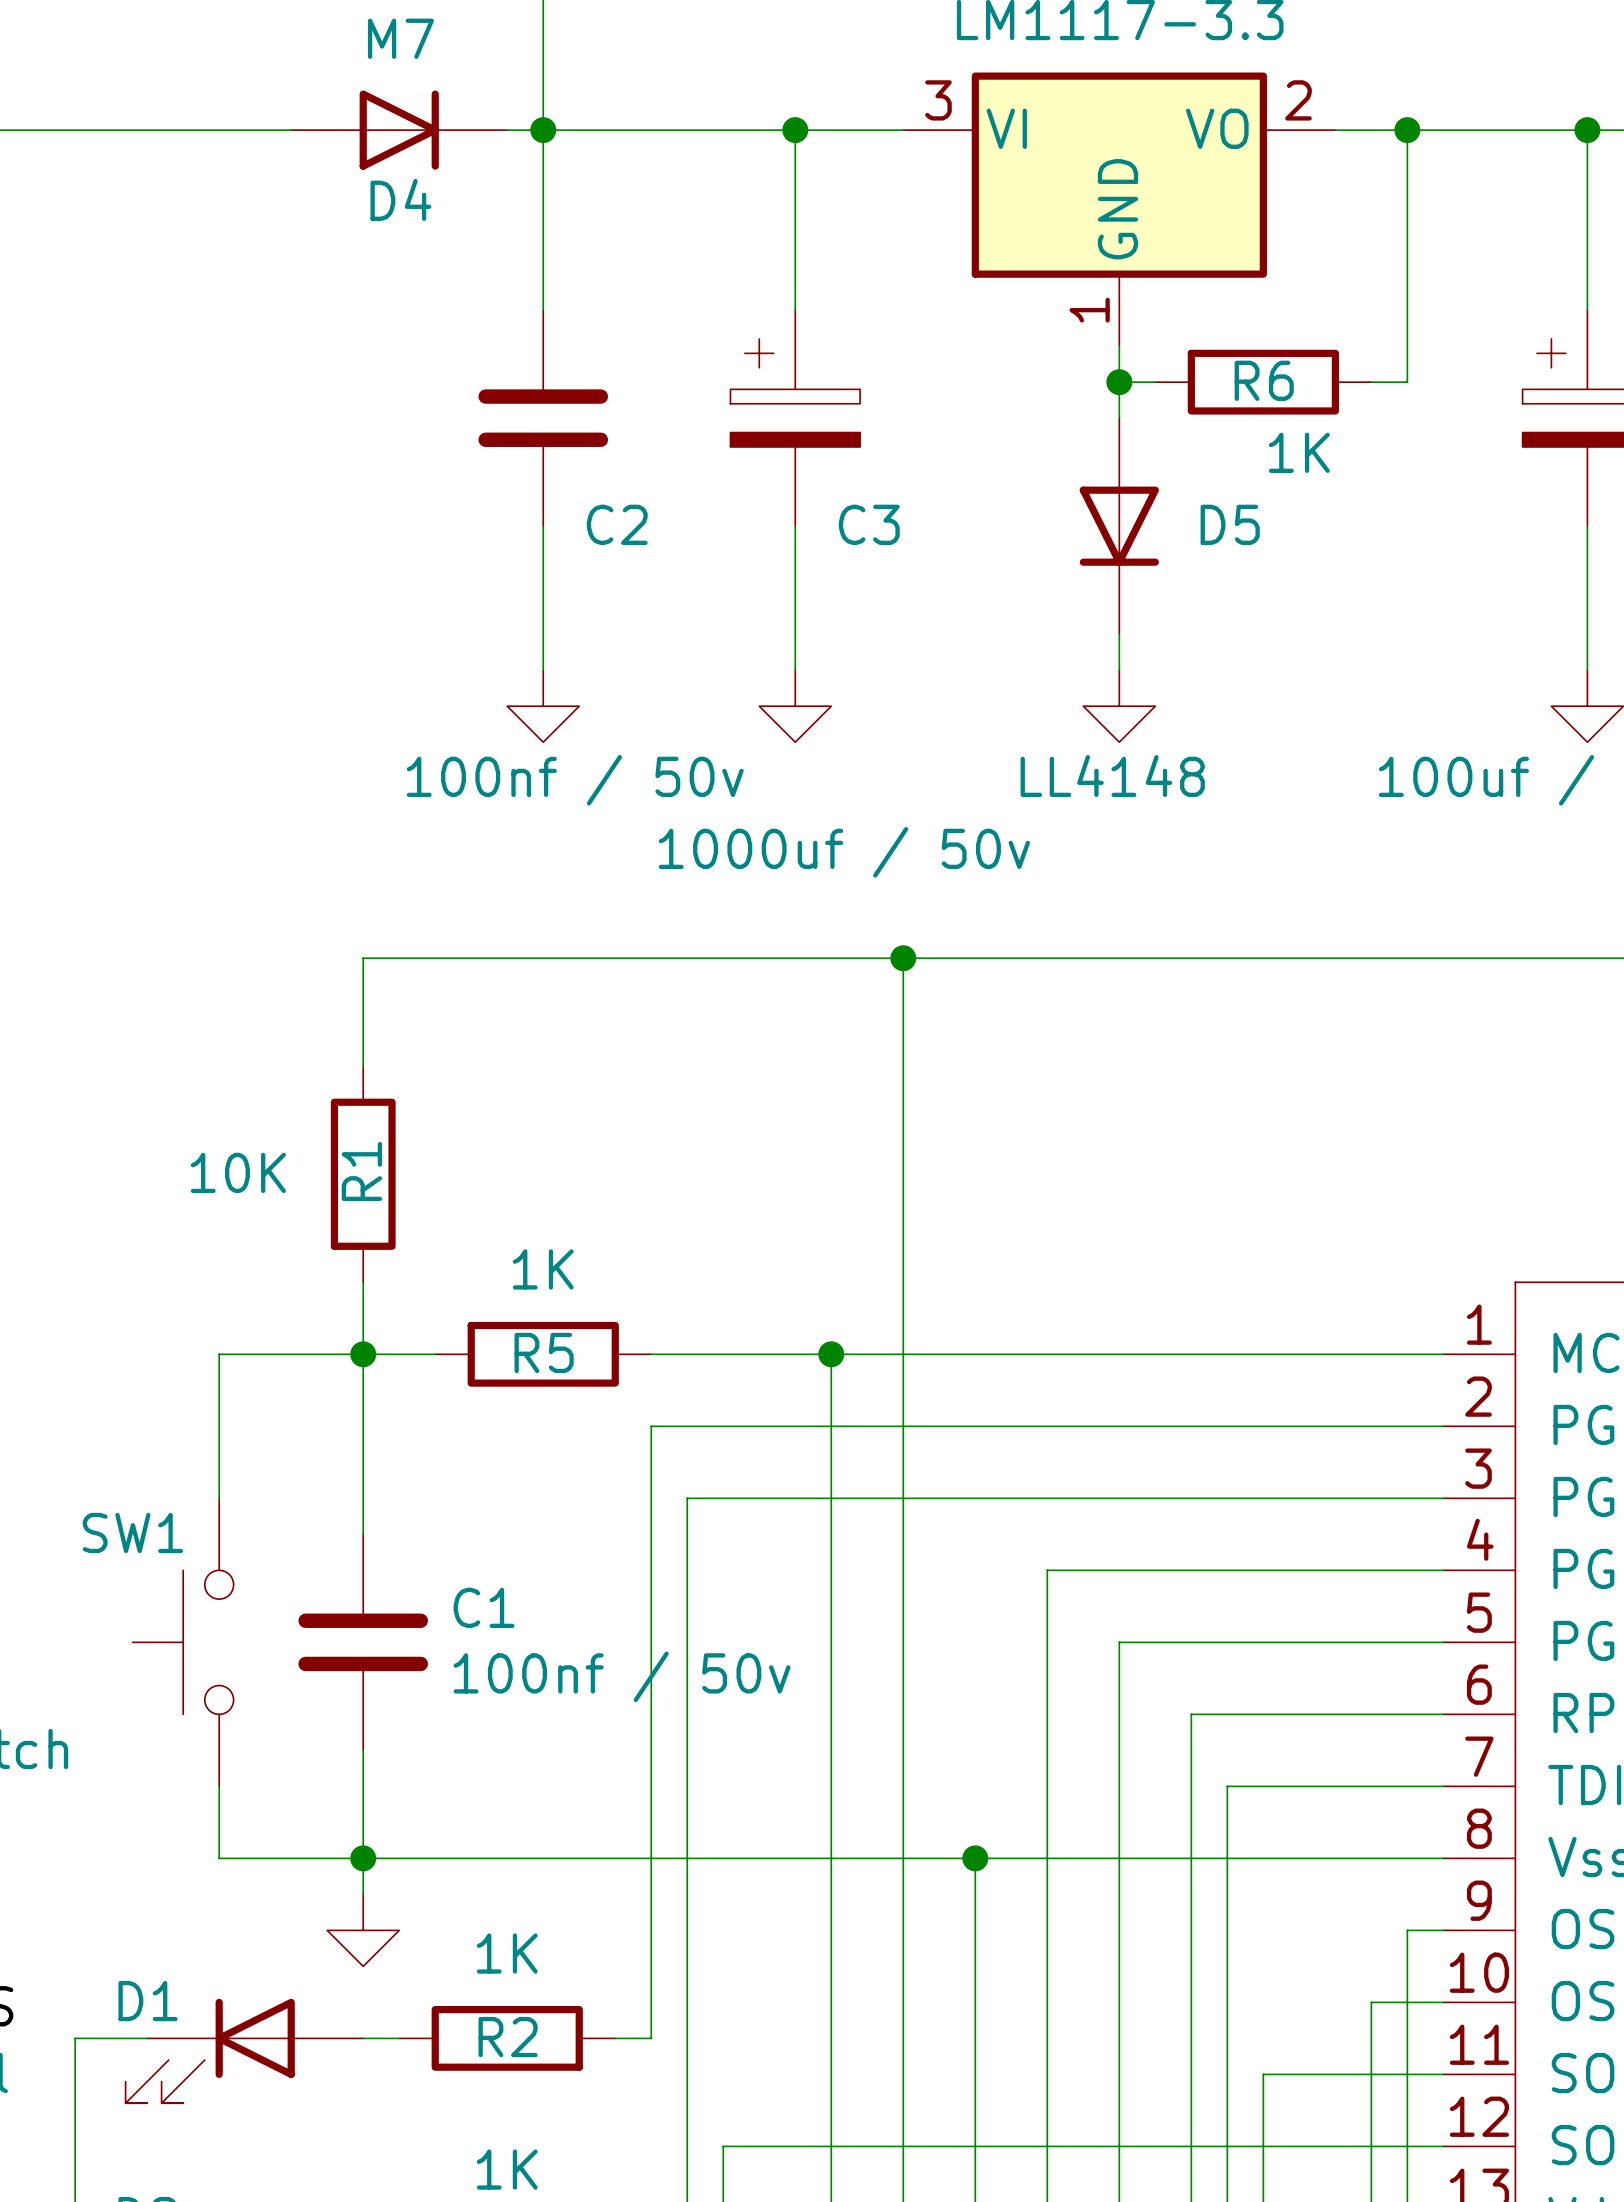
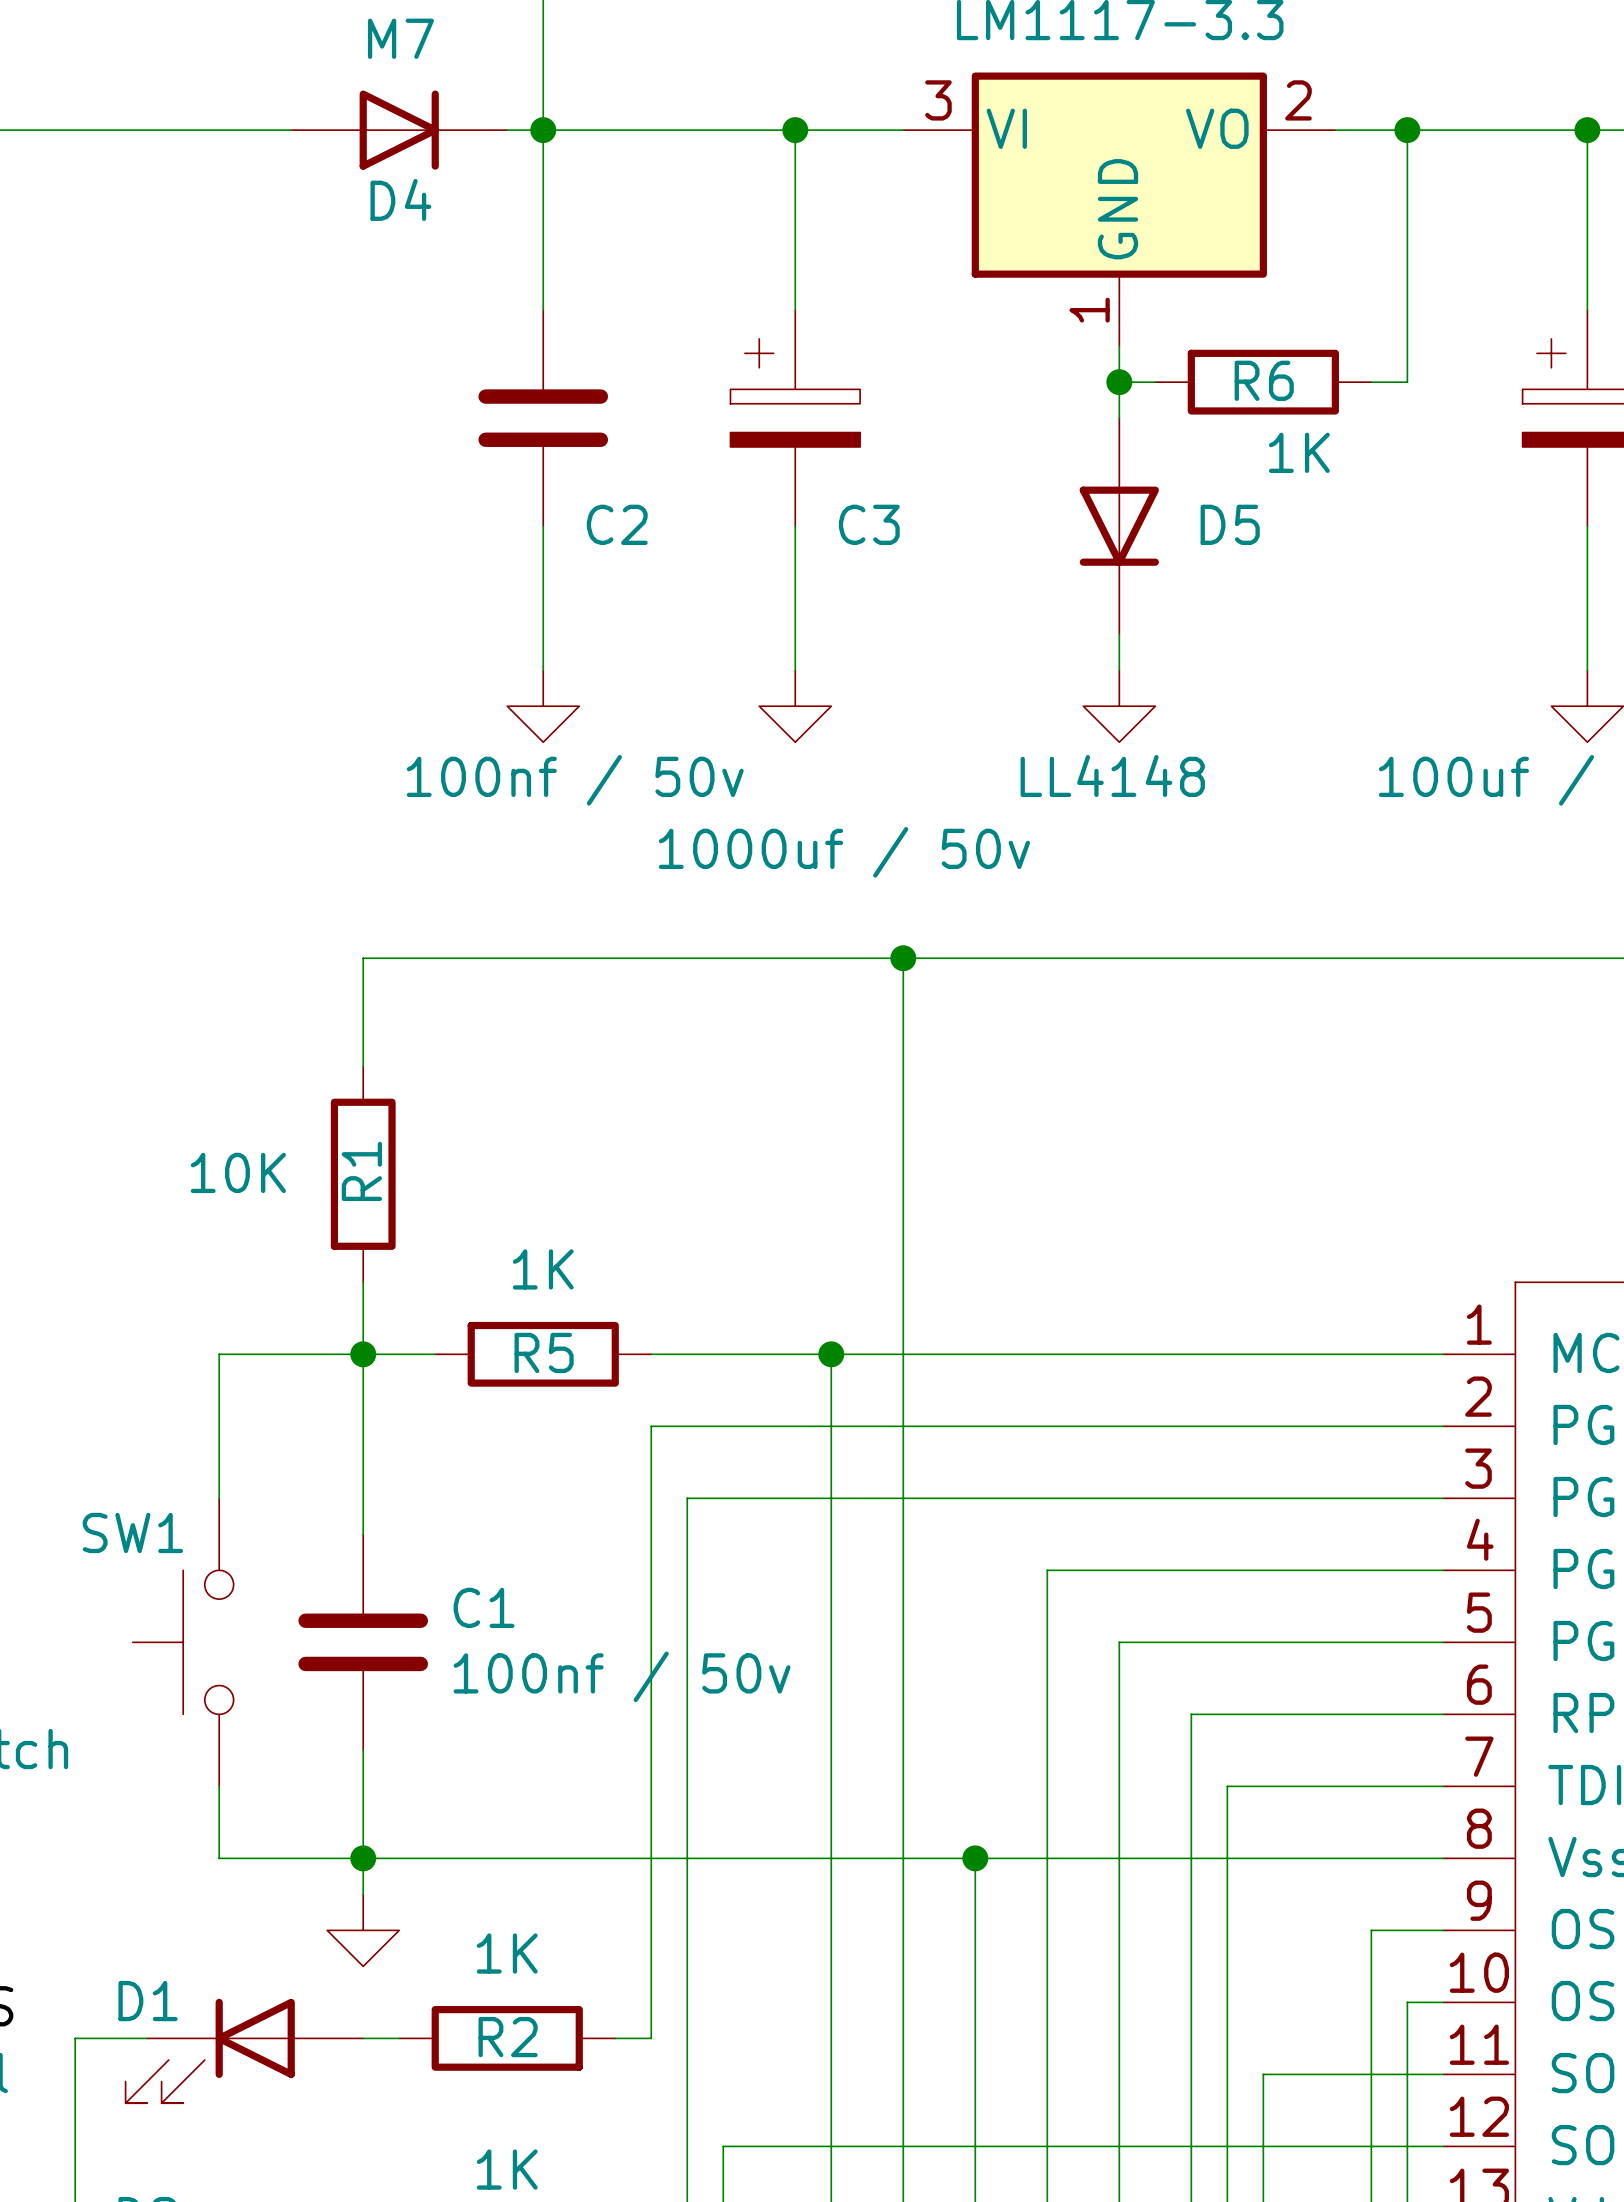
wire: (1407, 1930) (1407, 2002) (1371, 2002) -> (1407, 1930) (1371, 1930) (1371, 2002)

